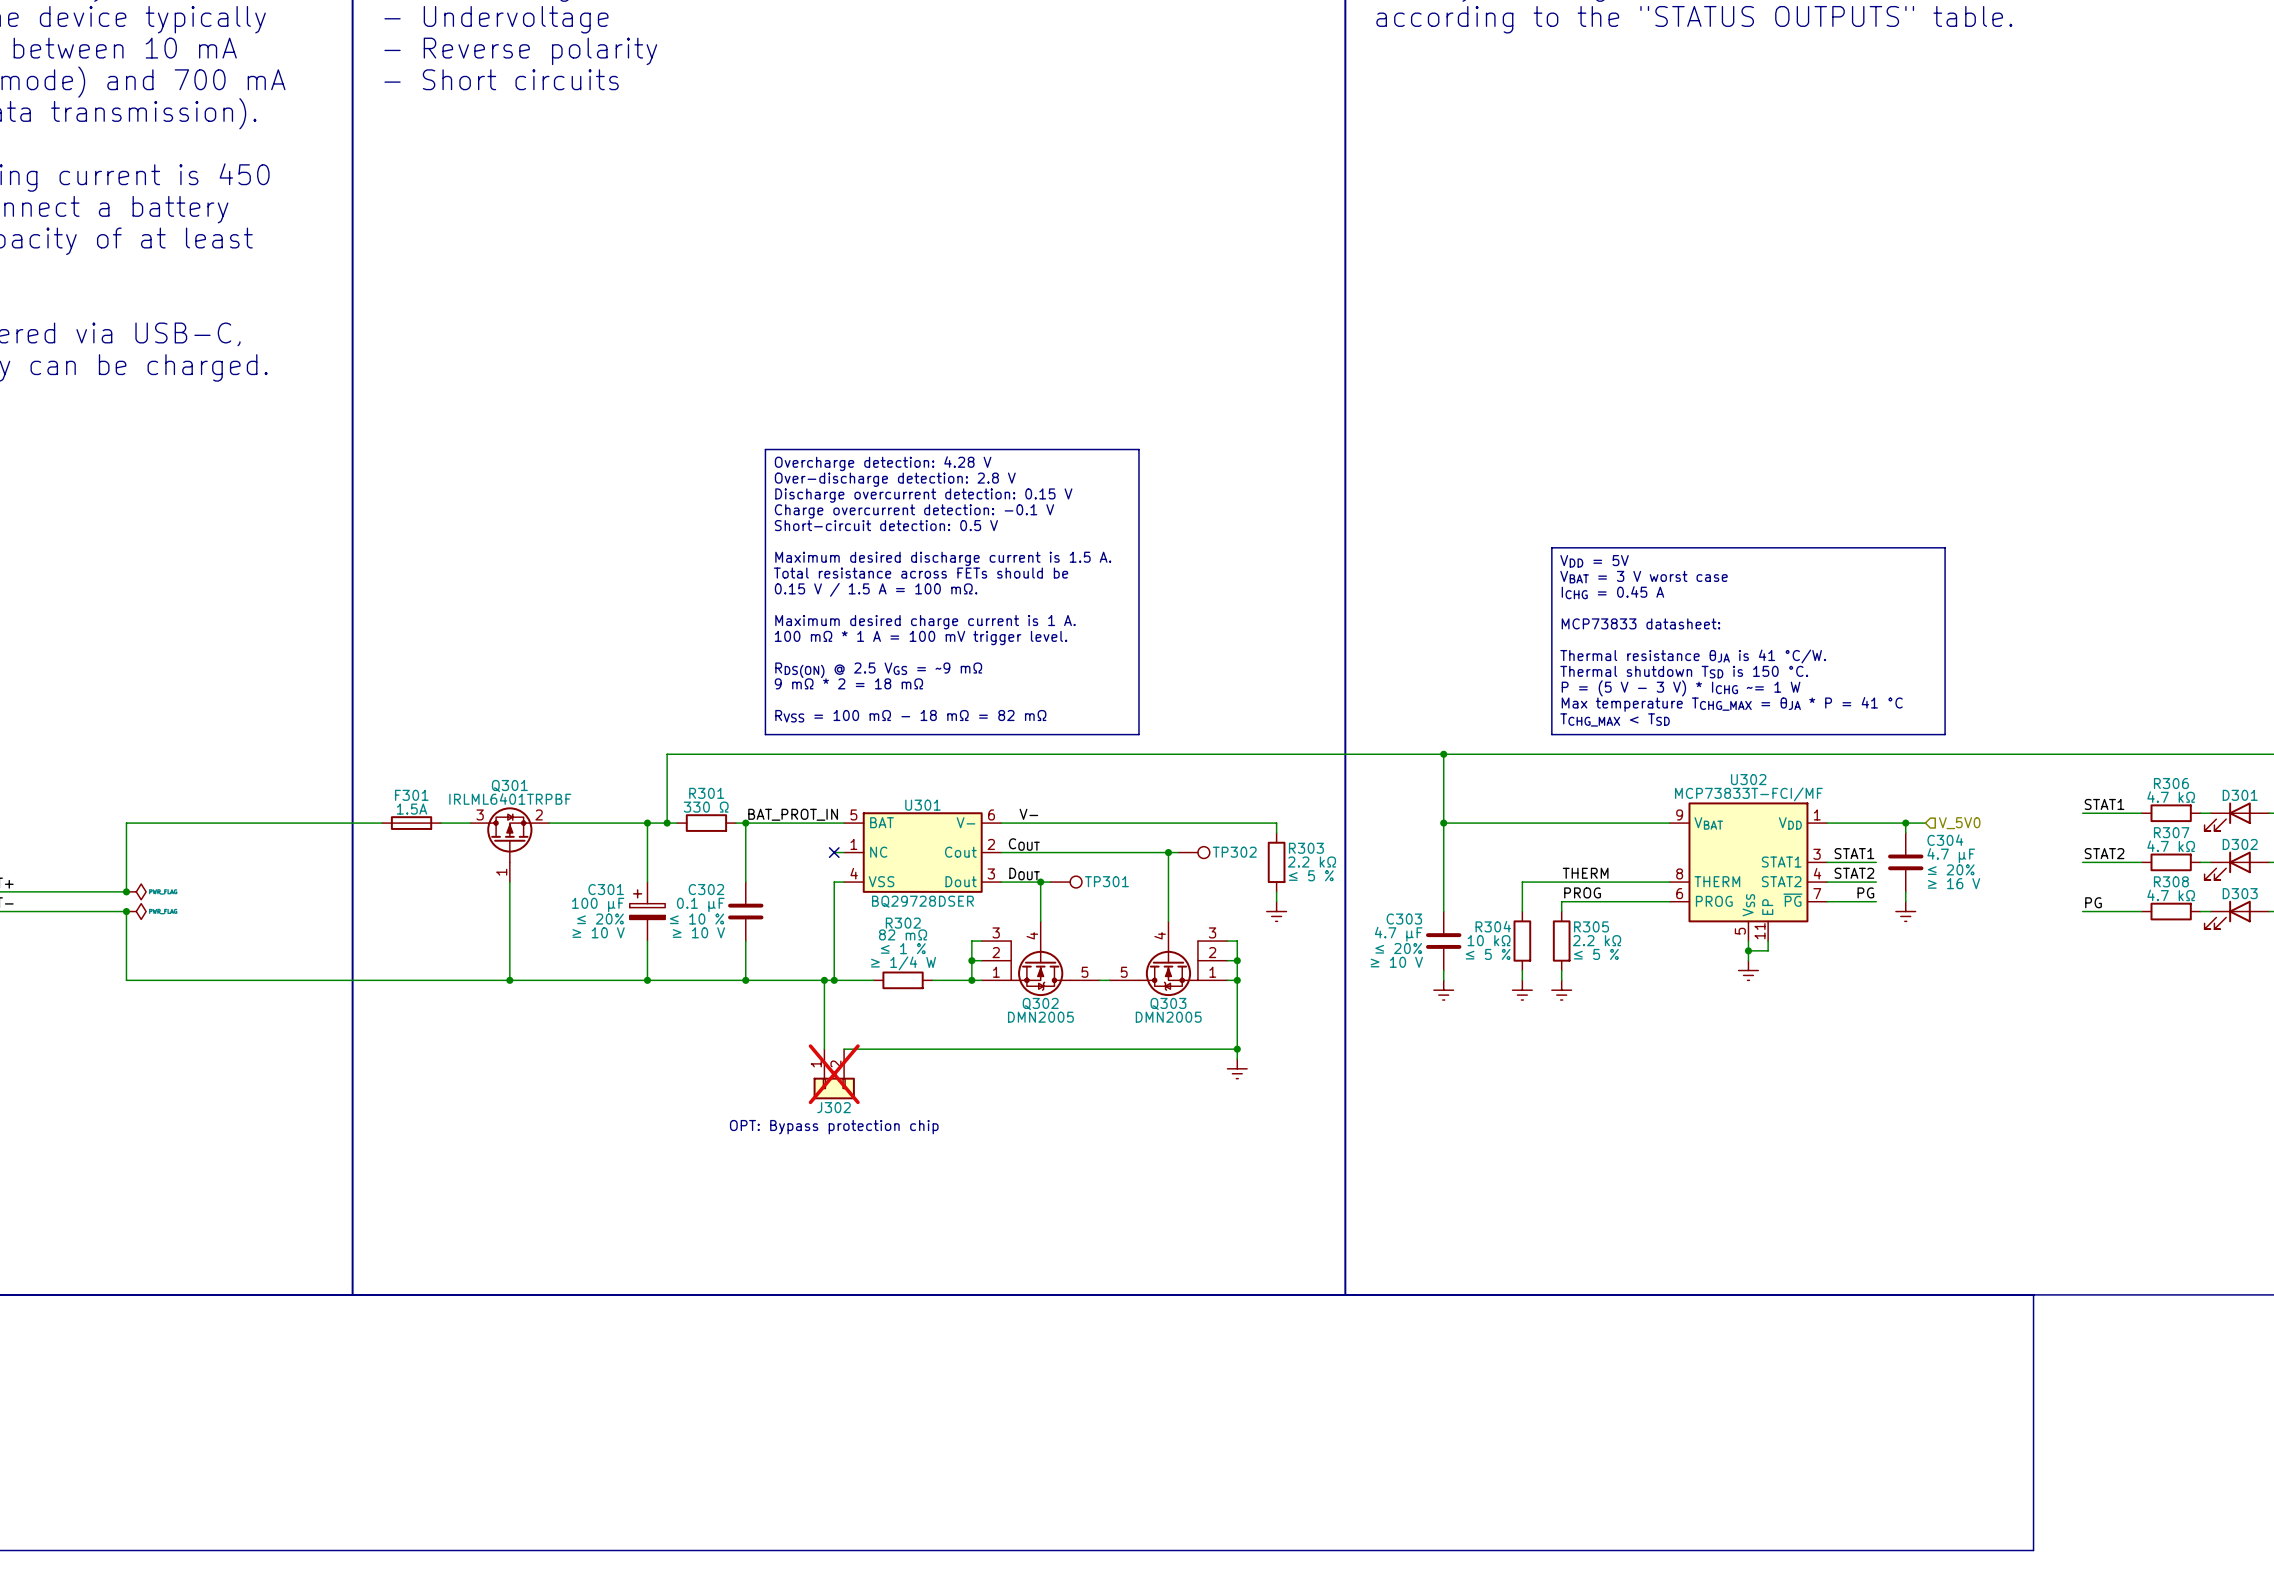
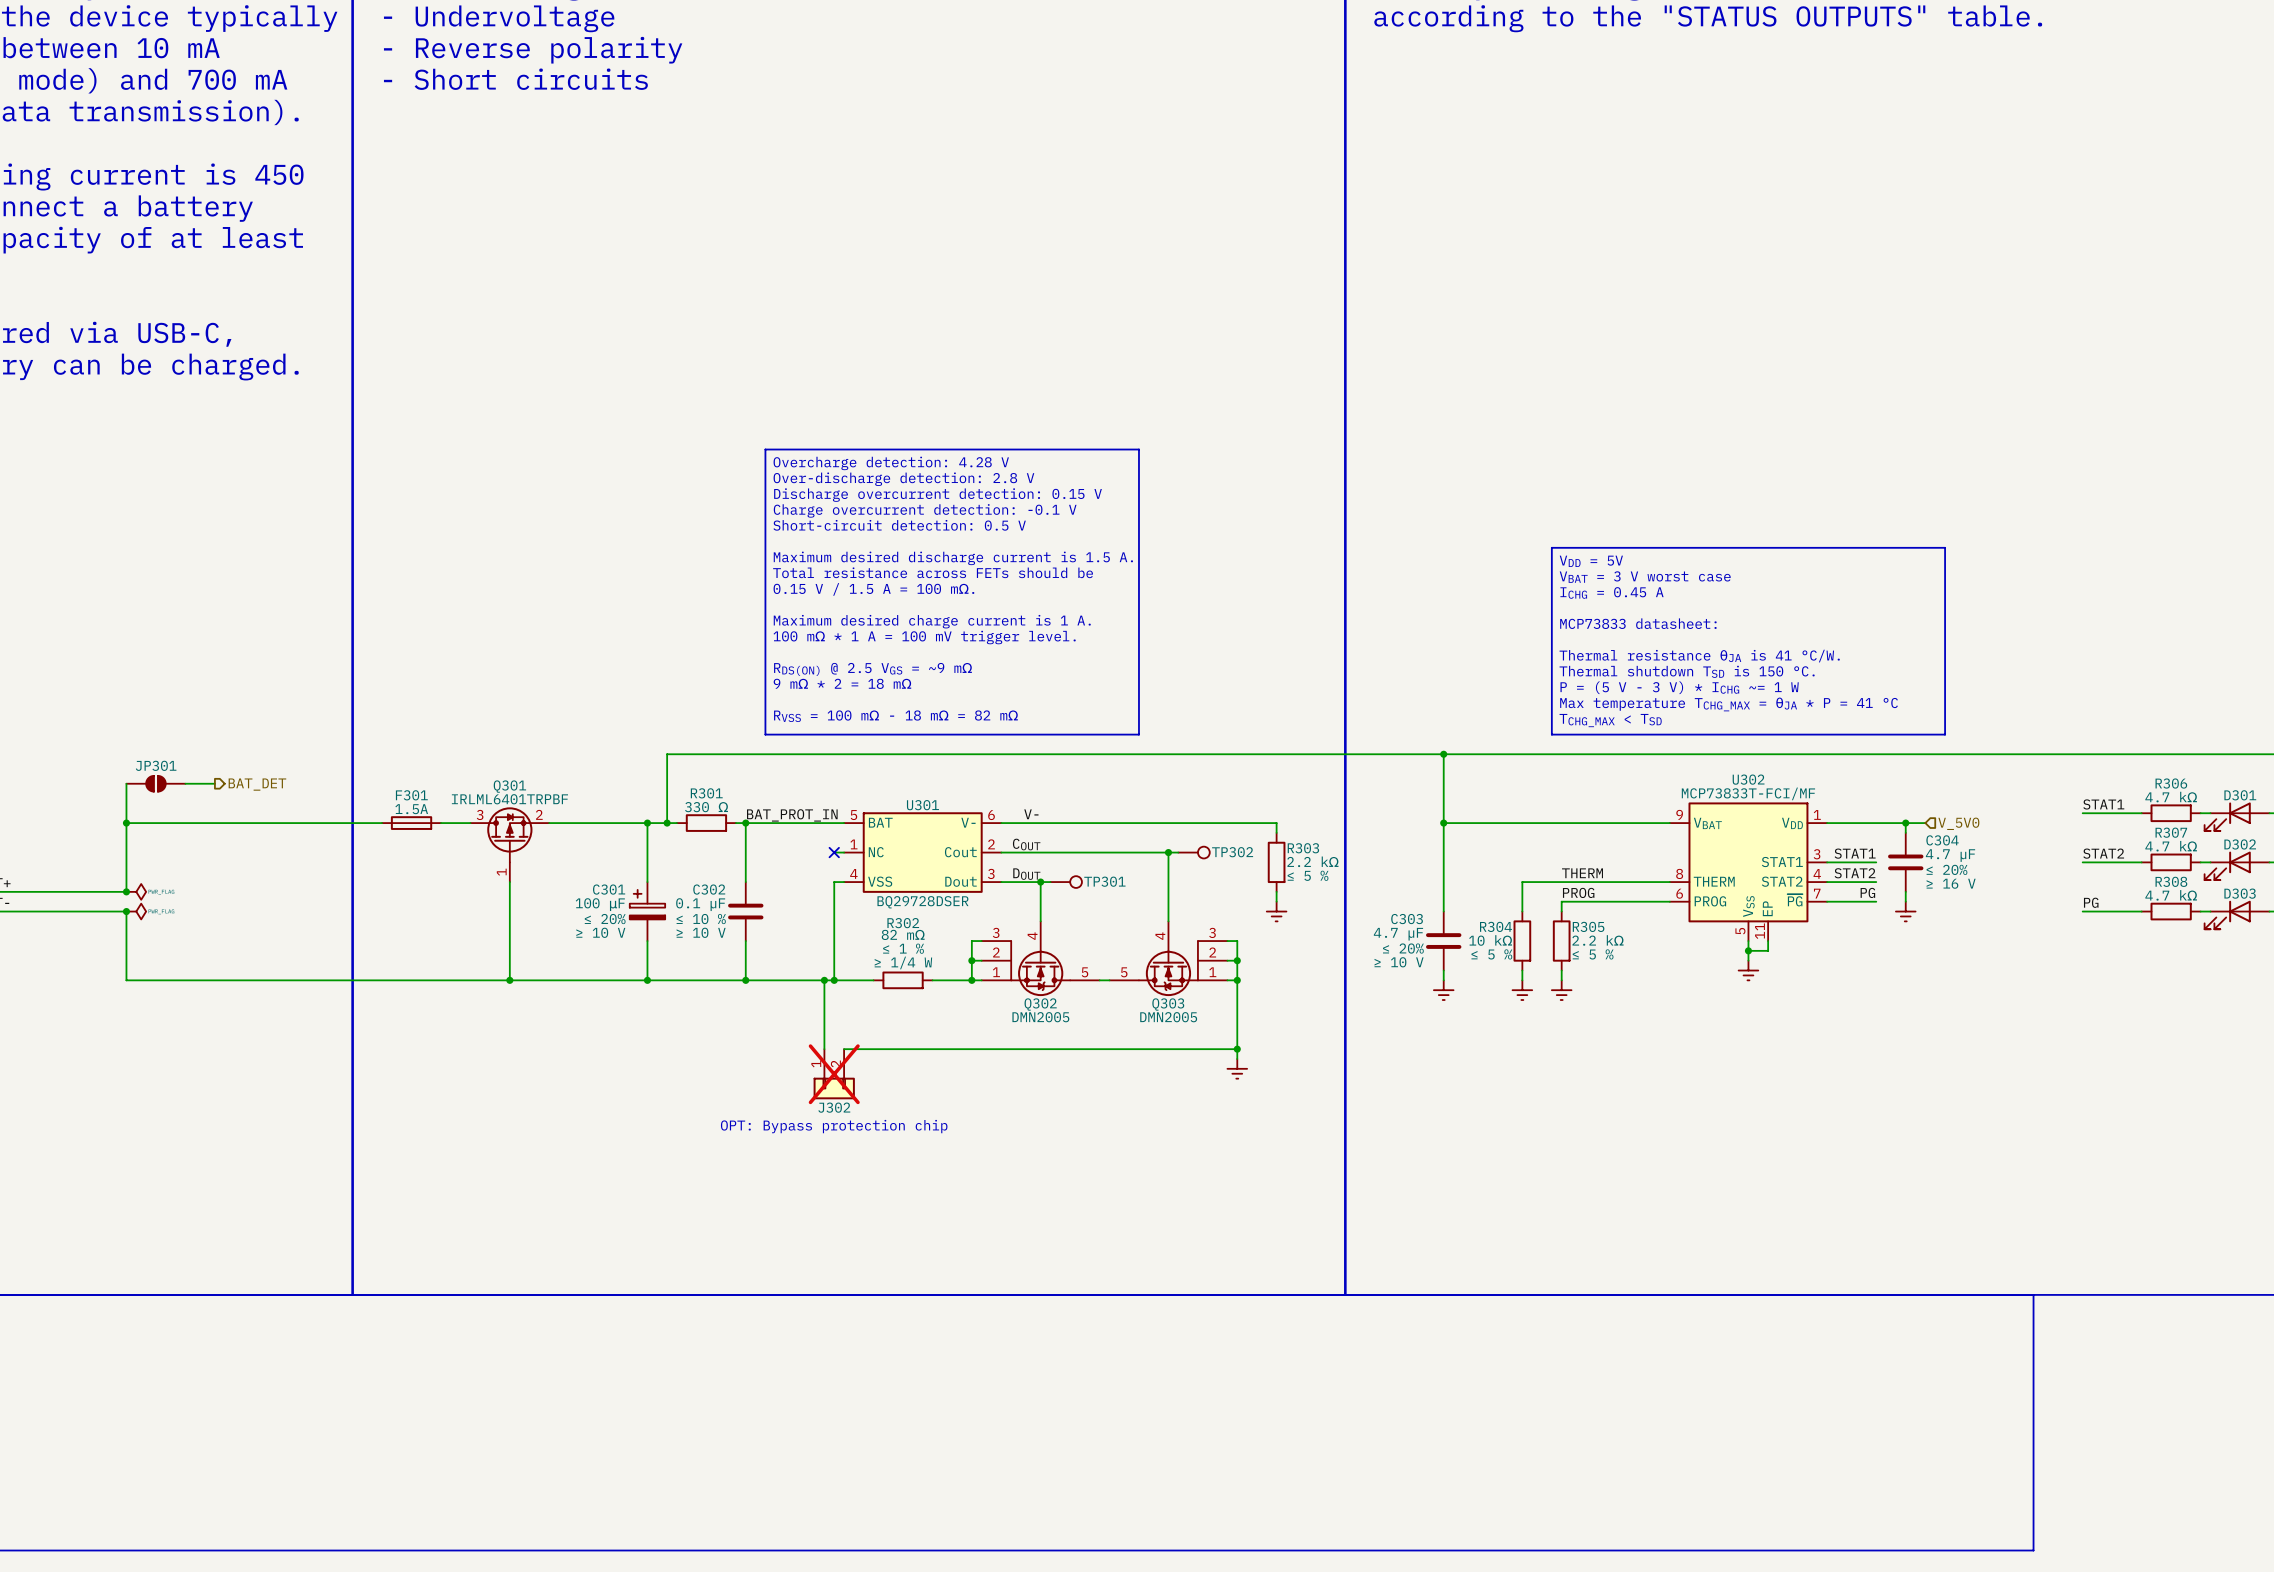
wire: none -> (126, 783) (126, 823)
JP301: none -> (155, 783)
wire: none -> (185, 783) (214, 783)
hierarchical label: none -> BAT_DET (257, 784)
junction: none -> (126, 823)

